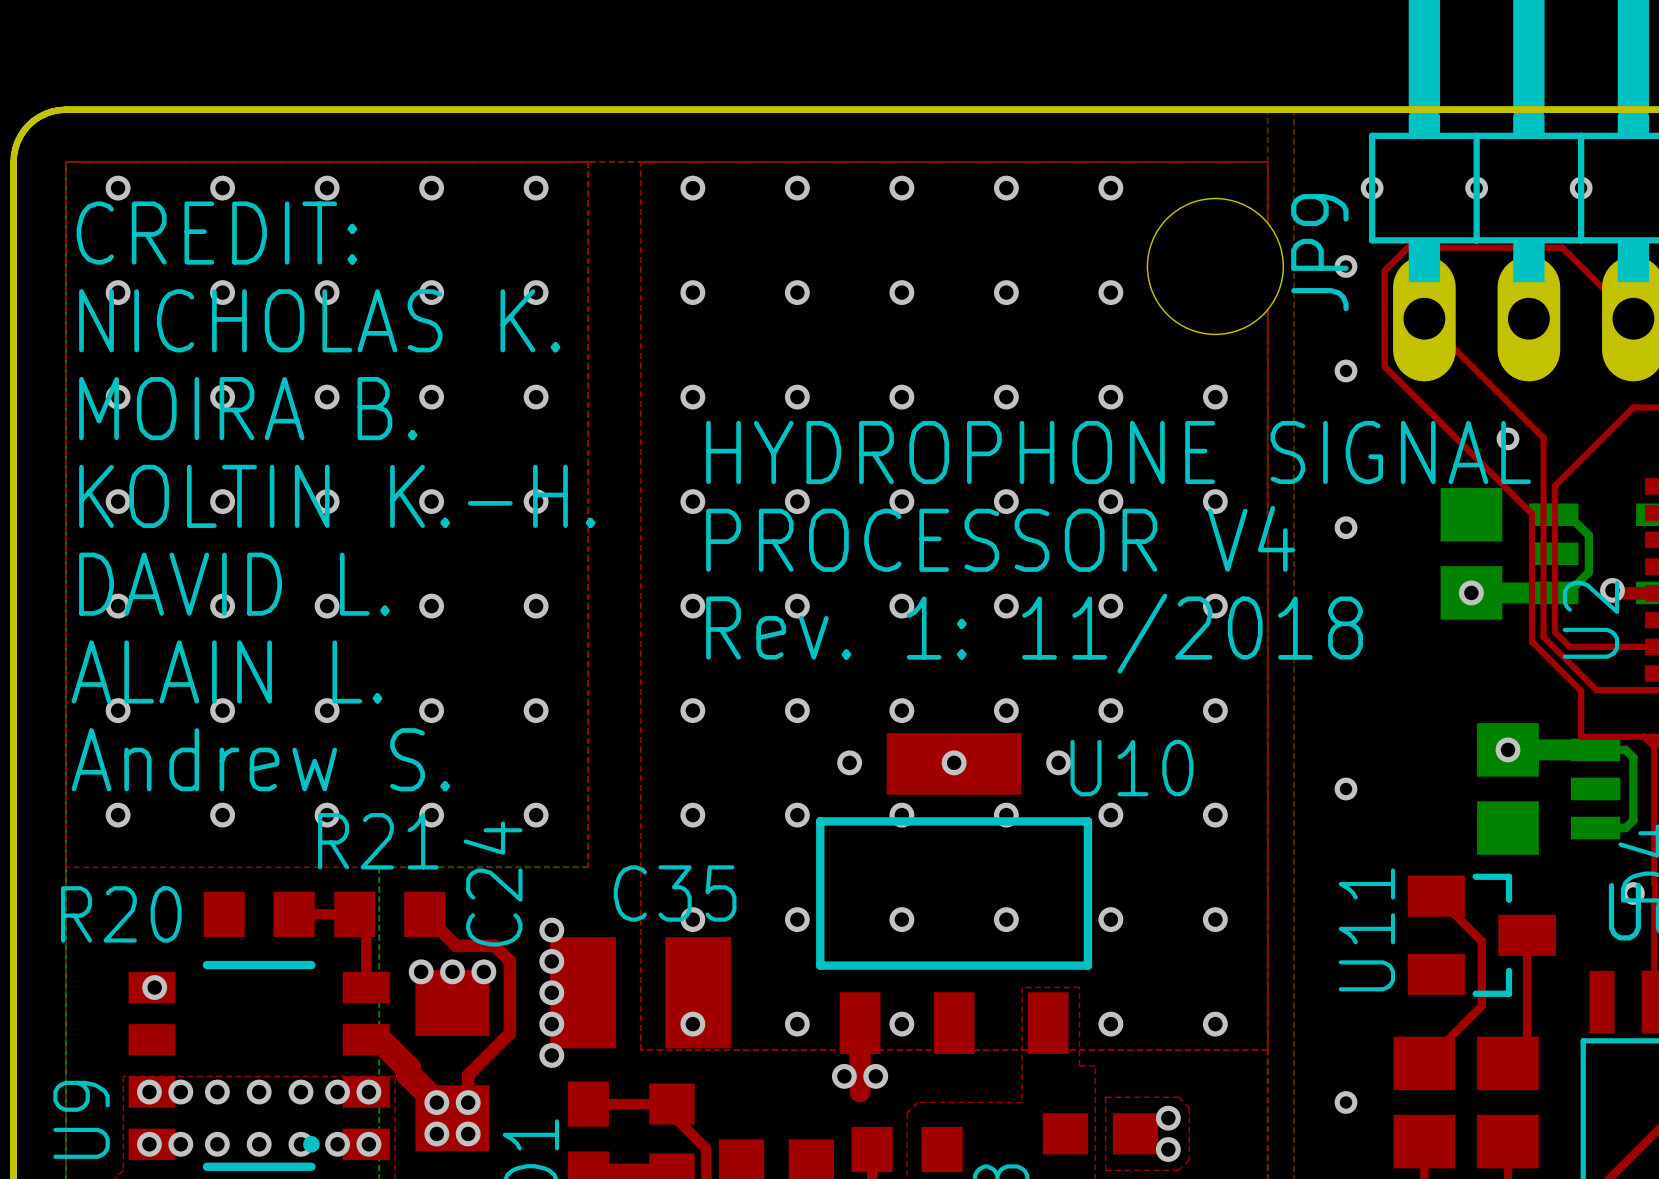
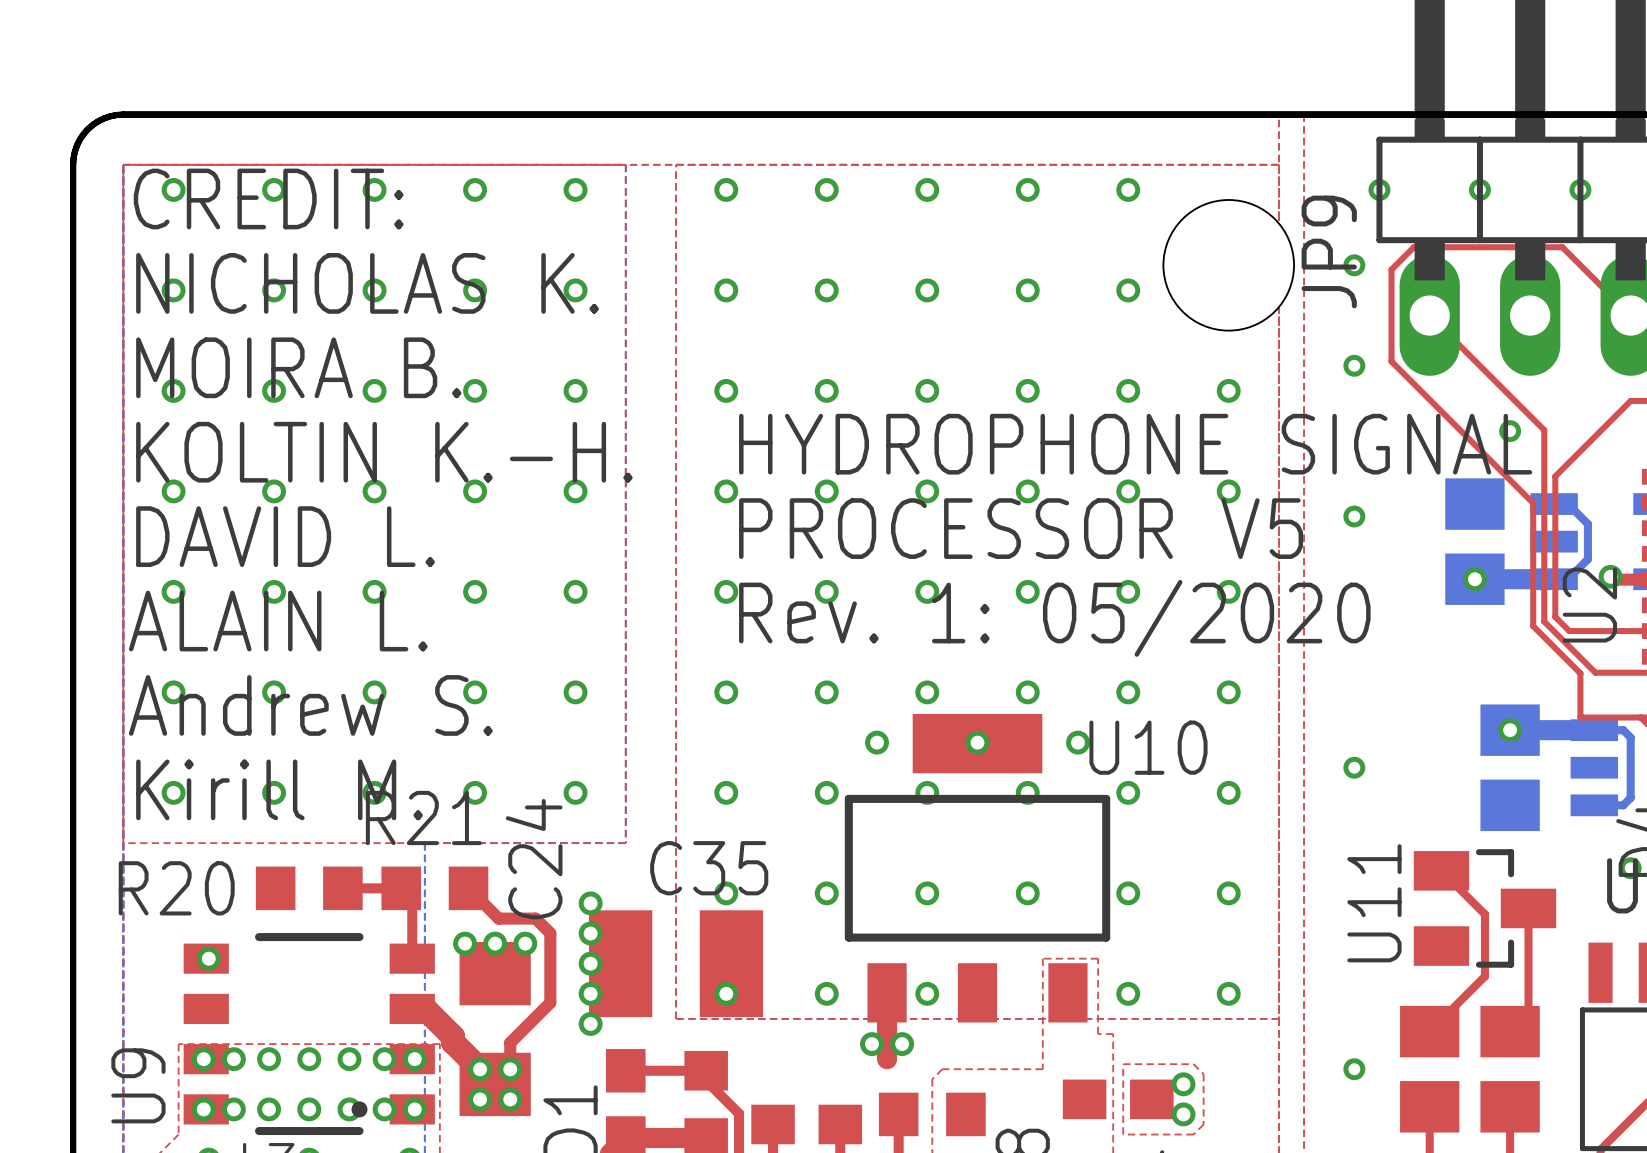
text position: CREDIT: (216, 233) -> CREDIT: (268, 198)
text position: NICHOLAS K. (319, 320) -> NICHOLAS K. (367, 283)
text position: MOIRA B. (248, 408) -> MOIRA B. (298, 367)
text position: KOLTIN K.-H. (337, 496) -> KOLTIN K.-H. (384, 452)
text: PROCESSOR V4 (1000, 538) -> PROCESSOR V5 (1021, 528)
text position: DAVID L. (234, 584) -> DAVID L. (285, 536)
text: Rev. 1: 11/2018 (1034, 633) -> Rev. 1: 05/2020 (1054, 618)
text position: ALAIN L. (226, 671) -> ALAIN L. (278, 621)
text position: Andrew S. (260, 759) -> Andrew S. (310, 705)
text: none -> Kirill M. (279, 789)

